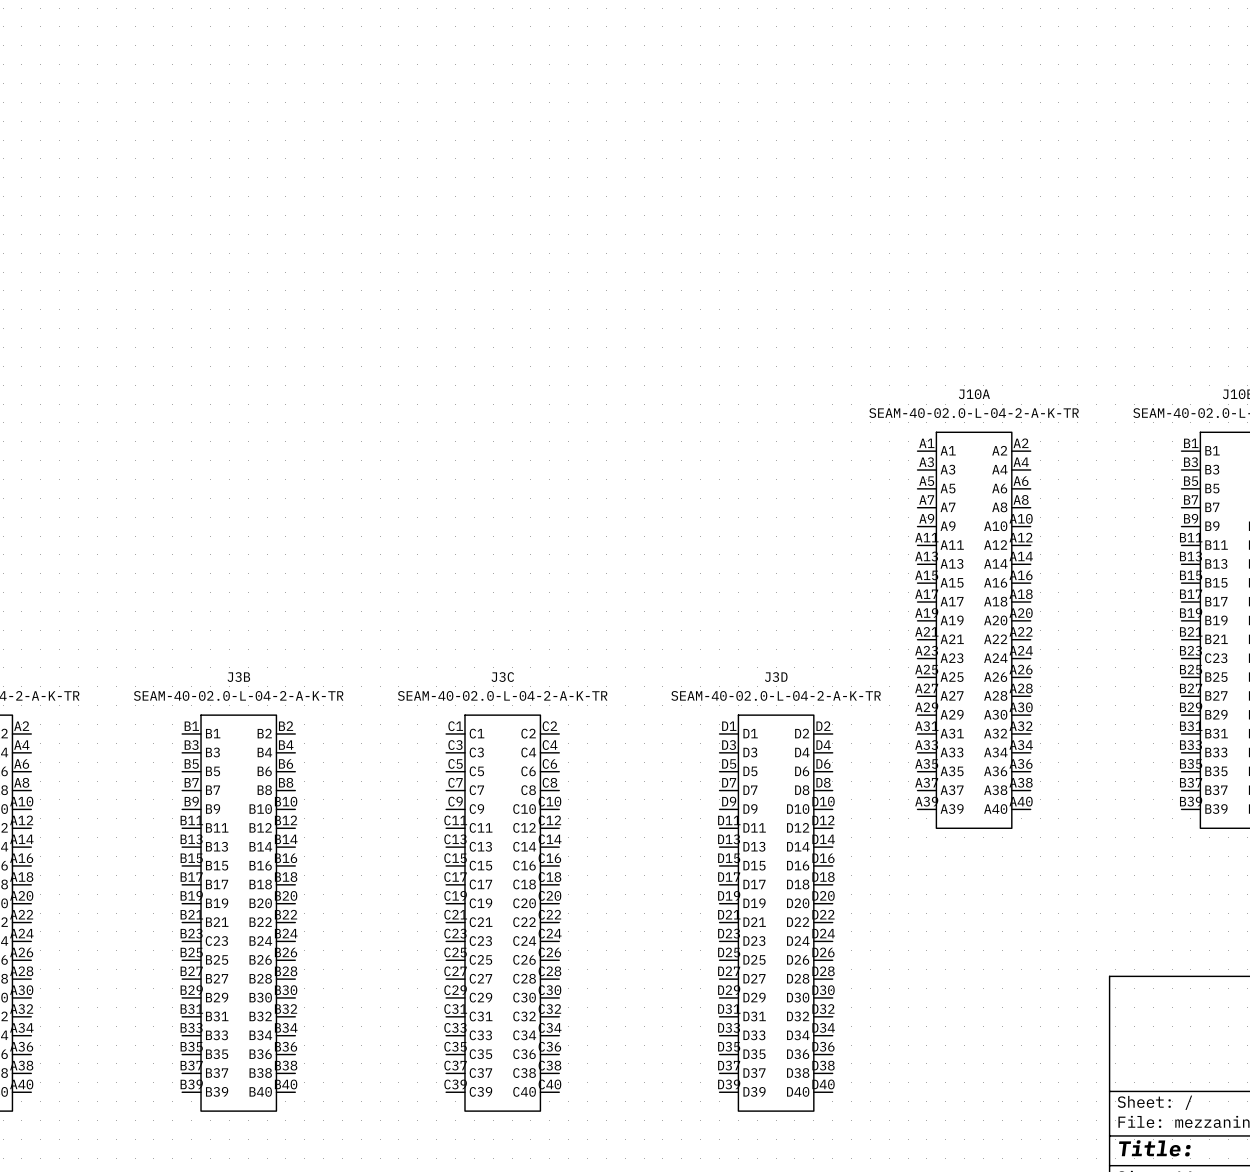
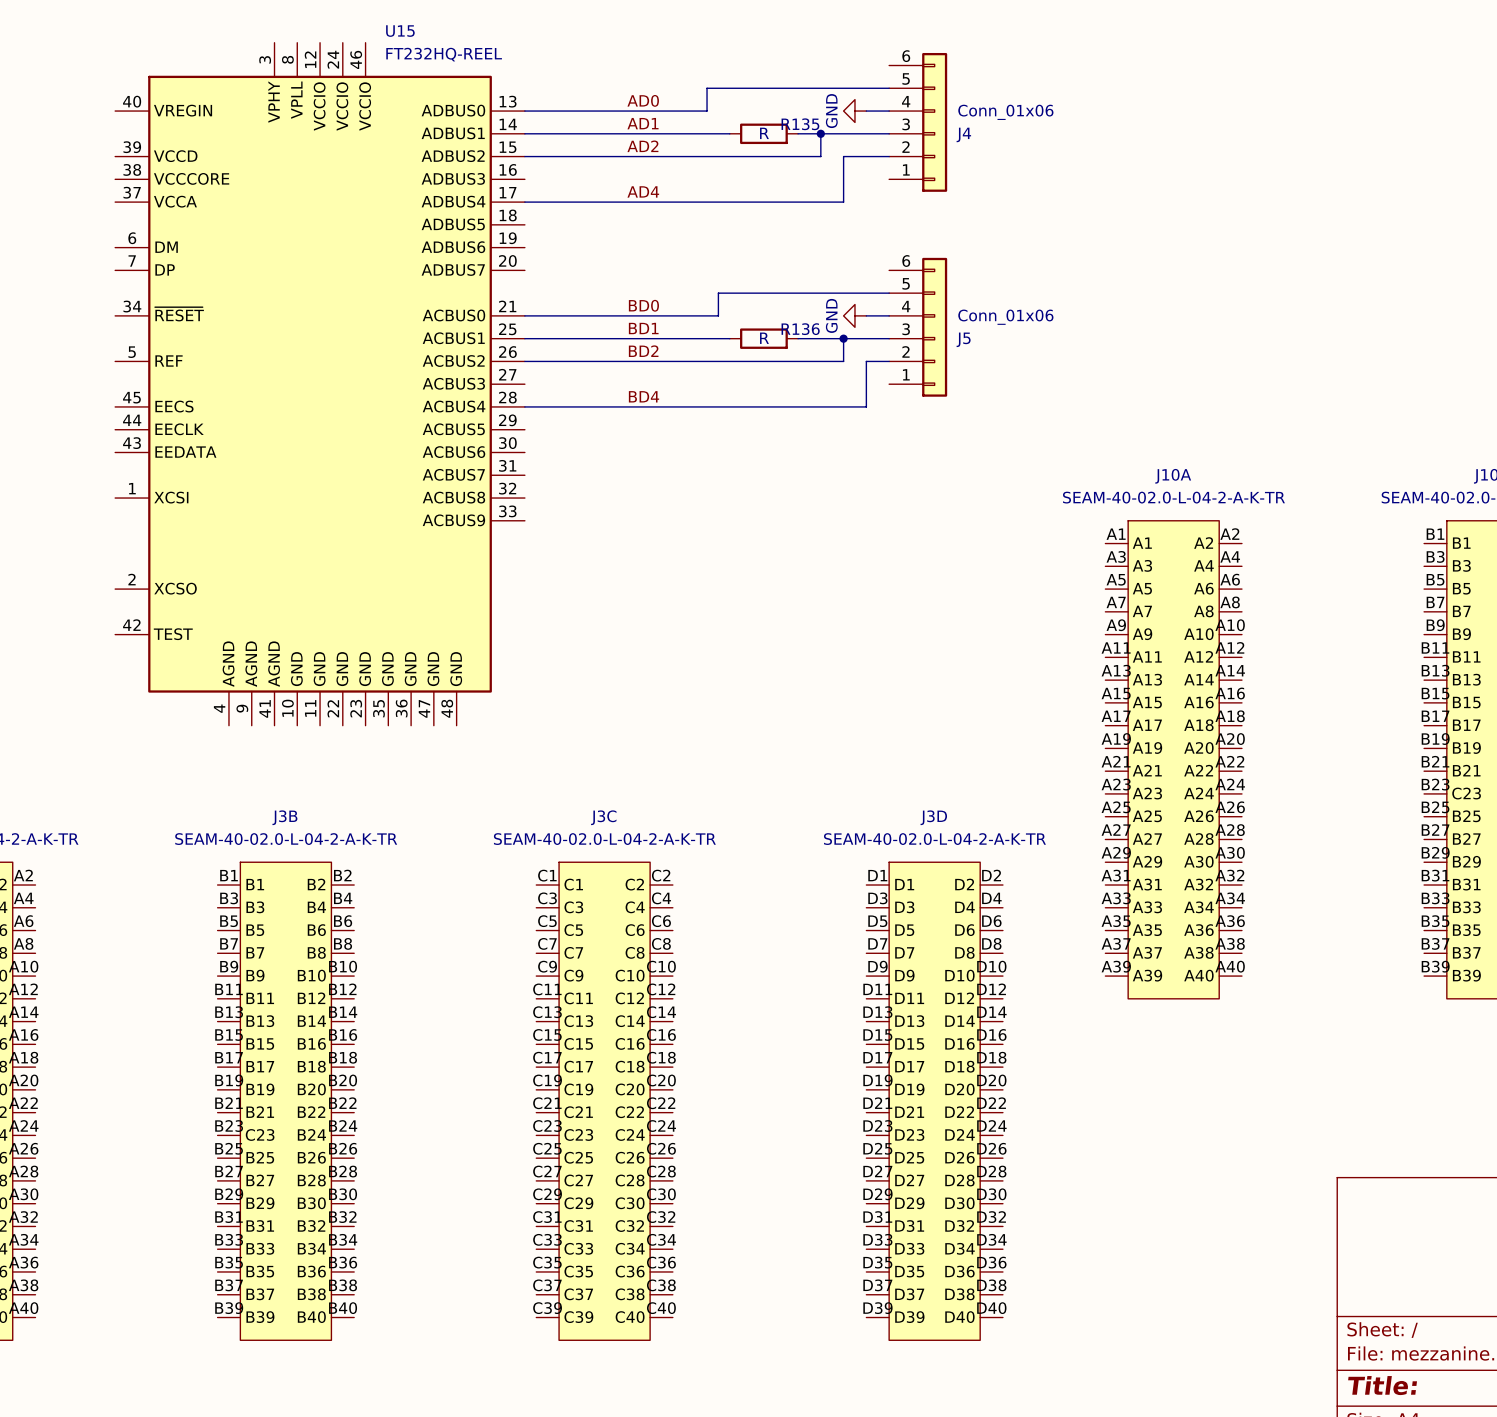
wire: none -> (889, 88) (707, 88) (707, 111) (524, 111)
label: none -> AD0 (643, 100)
power symbol: none -> GND (854, 111)
wire: none -> (866, 111) (889, 111)
J4: none -> Conn_01x06 (918, 122)
label: none -> AD1 (643, 123)
wire: none -> (524, 133) (729, 133)
R135: none -> R (763, 133)
wire: none -> (798, 133) (889, 133)
wire: none -> (820, 133) (820, 156) (524, 156)
junction: none -> (820, 133)
label: none -> AD2 (642, 146)
wire: none -> (889, 156) (843, 156) (843, 202) (524, 202)
label: none -> AD4 (643, 191)
wire: none -> (889, 293) (718, 293) (718, 315) (524, 315)
label: none -> BD0 (643, 305)
power symbol: none -> GND (854, 315)
wire: none -> (866, 315) (889, 315)
J5: none -> Conn_01x06 (918, 327)
label: none -> BD1 (643, 328)
wire: none -> (524, 338) (729, 338)
R136: none -> R (763, 338)
wire: none -> (798, 338) (889, 338)
wire: none -> (843, 338) (843, 361) (524, 361)
junction: none -> (843, 338)
label: none -> BD2 (643, 351)
wire: none -> (889, 361) (866, 361) (866, 406) (524, 406)
U15: none -> FT232HQ-REEL (320, 384)
label: none -> BD4 (644, 396)

